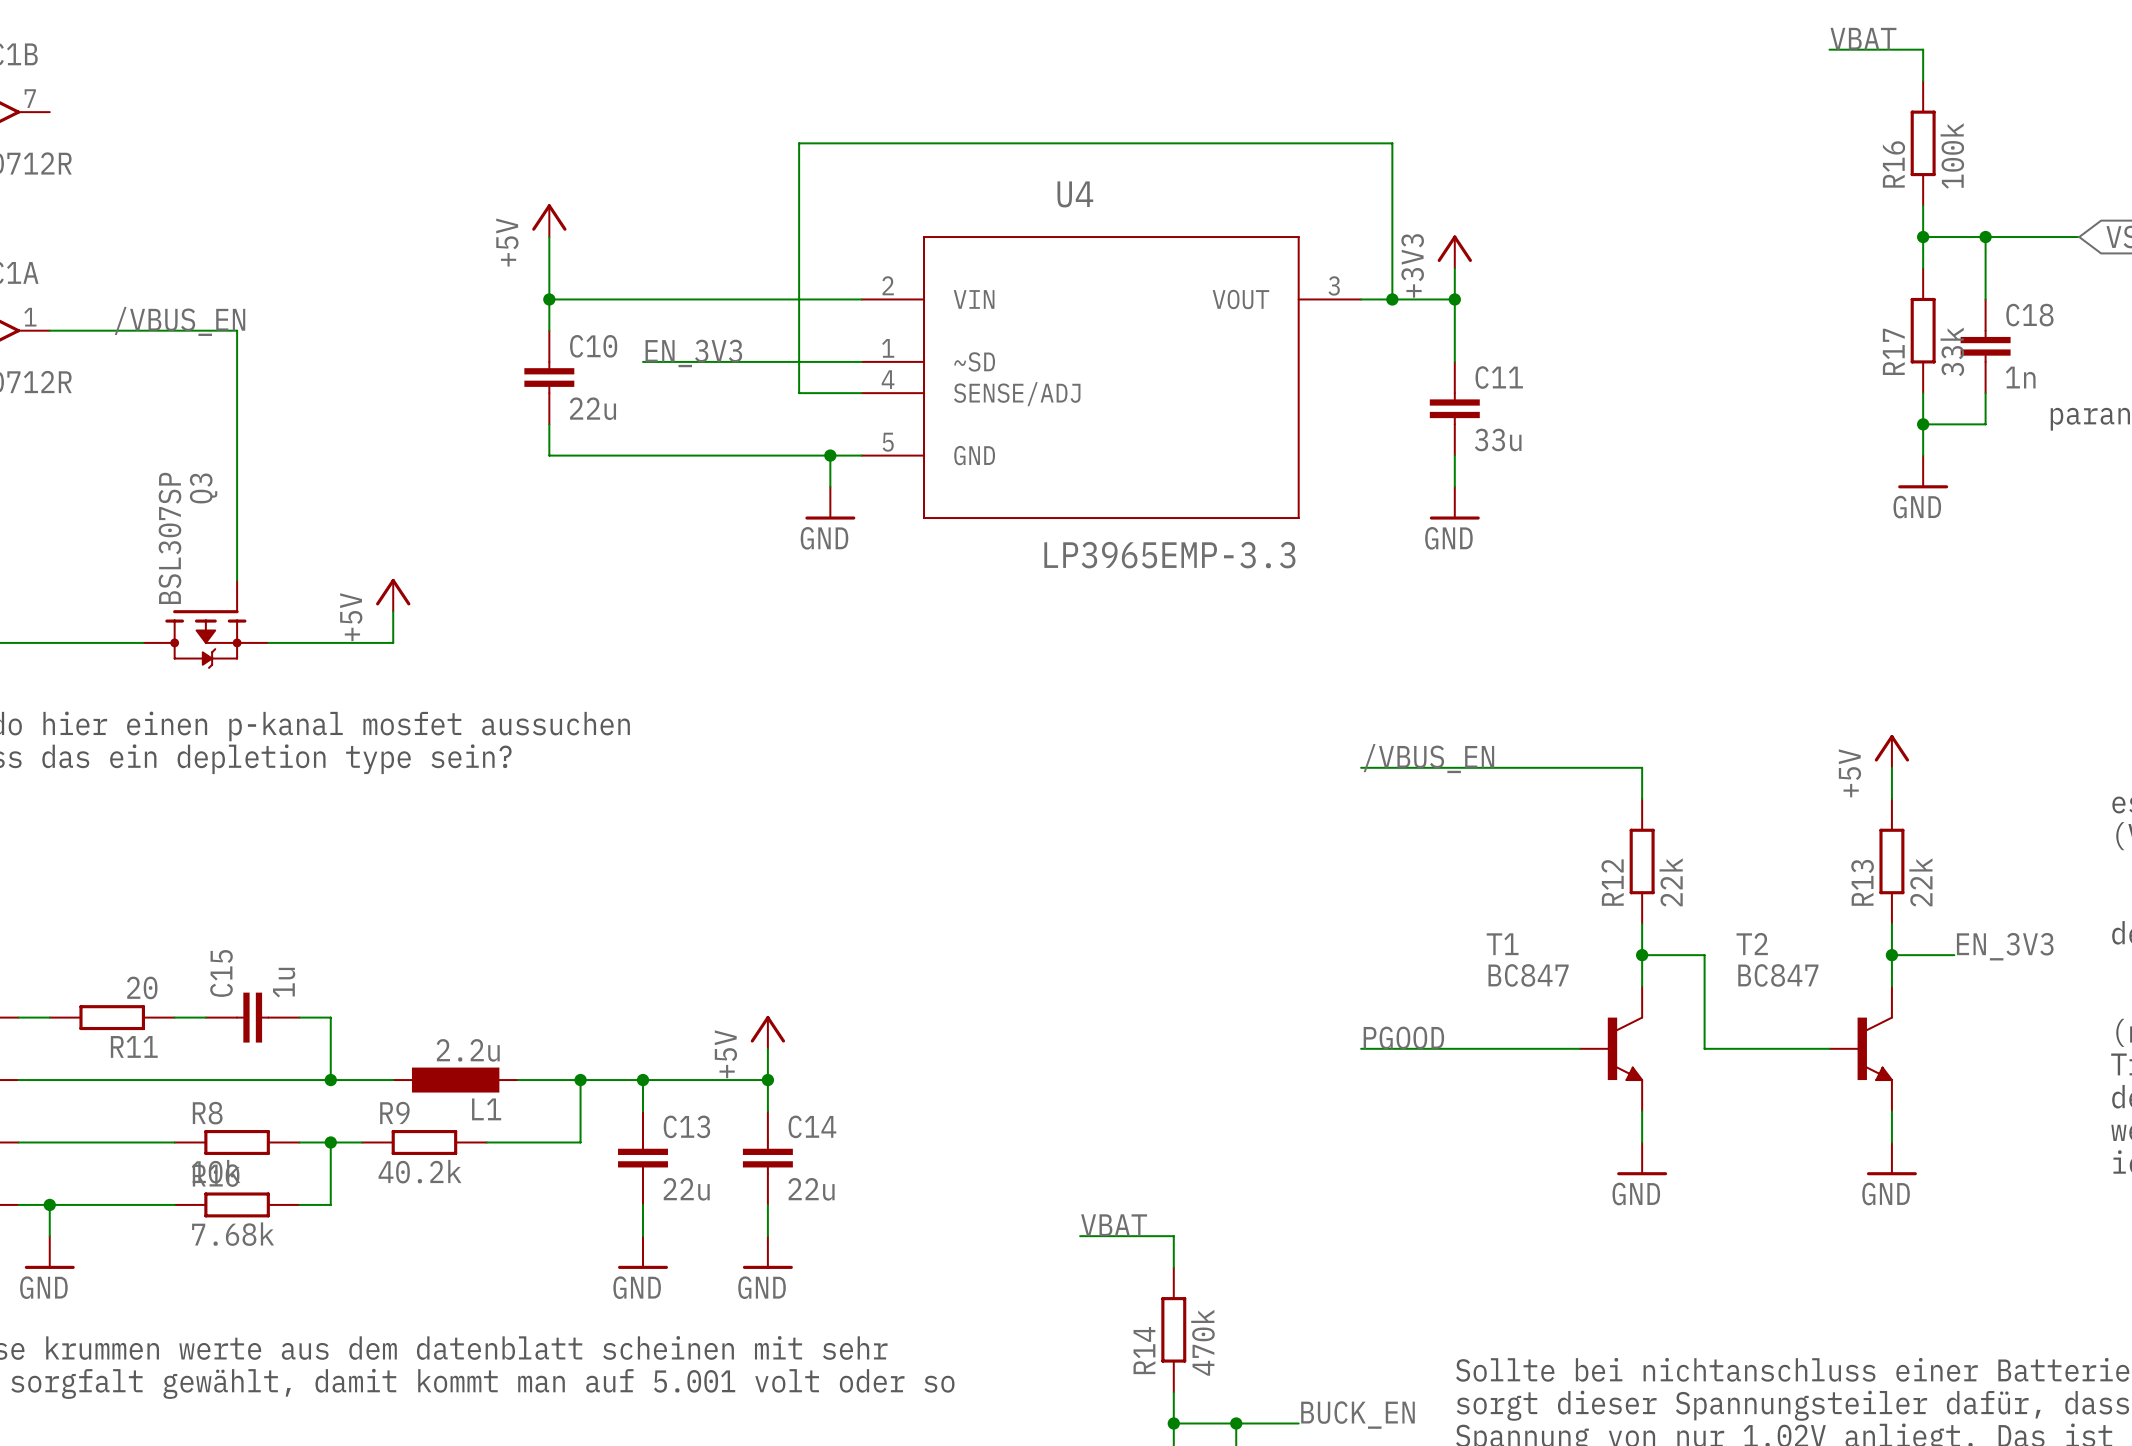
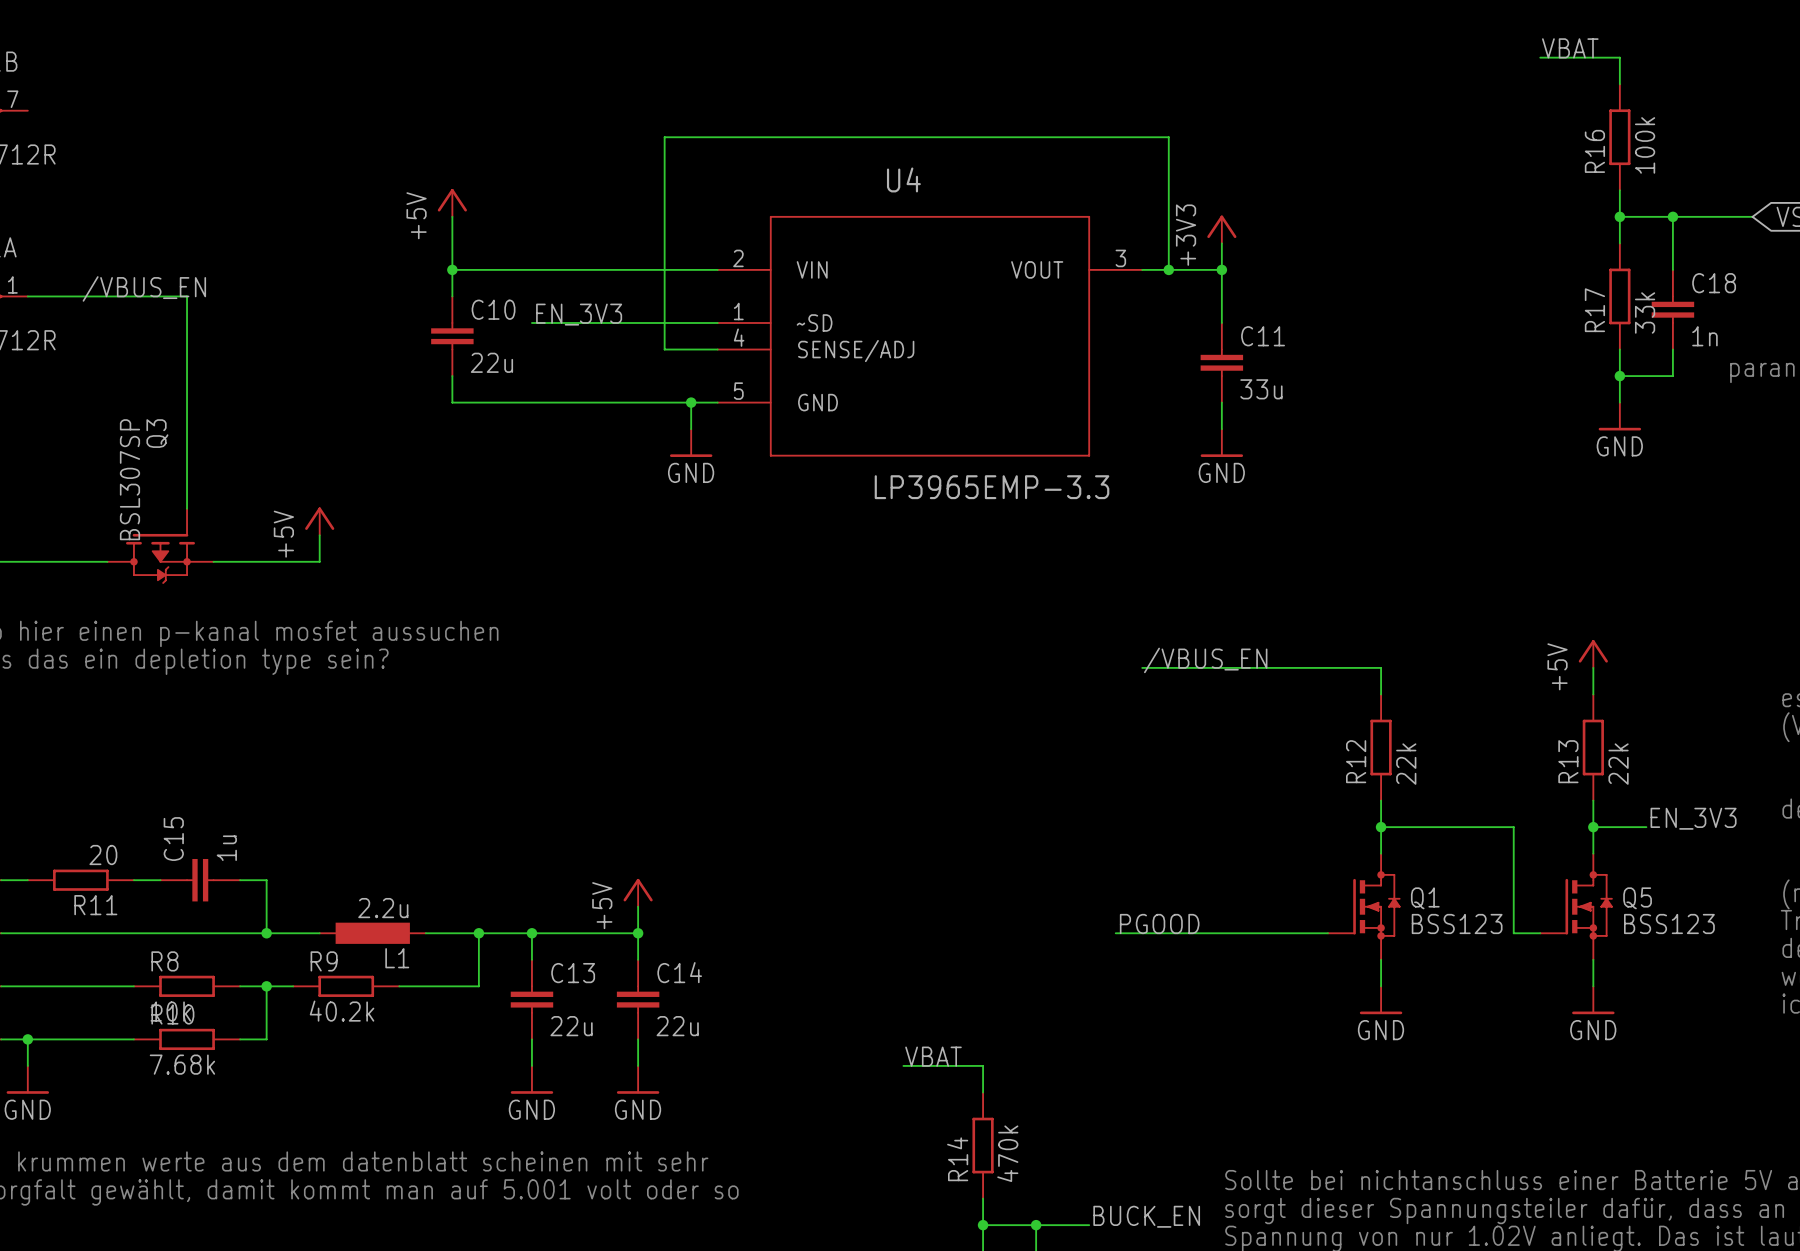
wire: (1704, 955) (1704, 1048) (1829, 1048) -> (1434, 827) (1513, 827) (1513, 933) (1540, 933)
label position: PGOOD (1403, 1037) -> PGOOD (1159, 923)
wire: (1361, 1048) (1579, 1048) -> none
T1: BC847 (1611, 1048) -> none
Q1: none -> BSS123 (1364, 906)
T2: BC847 (1861, 1048) -> none
Q5: none -> BSS123 (1576, 906)
wire: none -> (1115, 933) (1327, 933)

